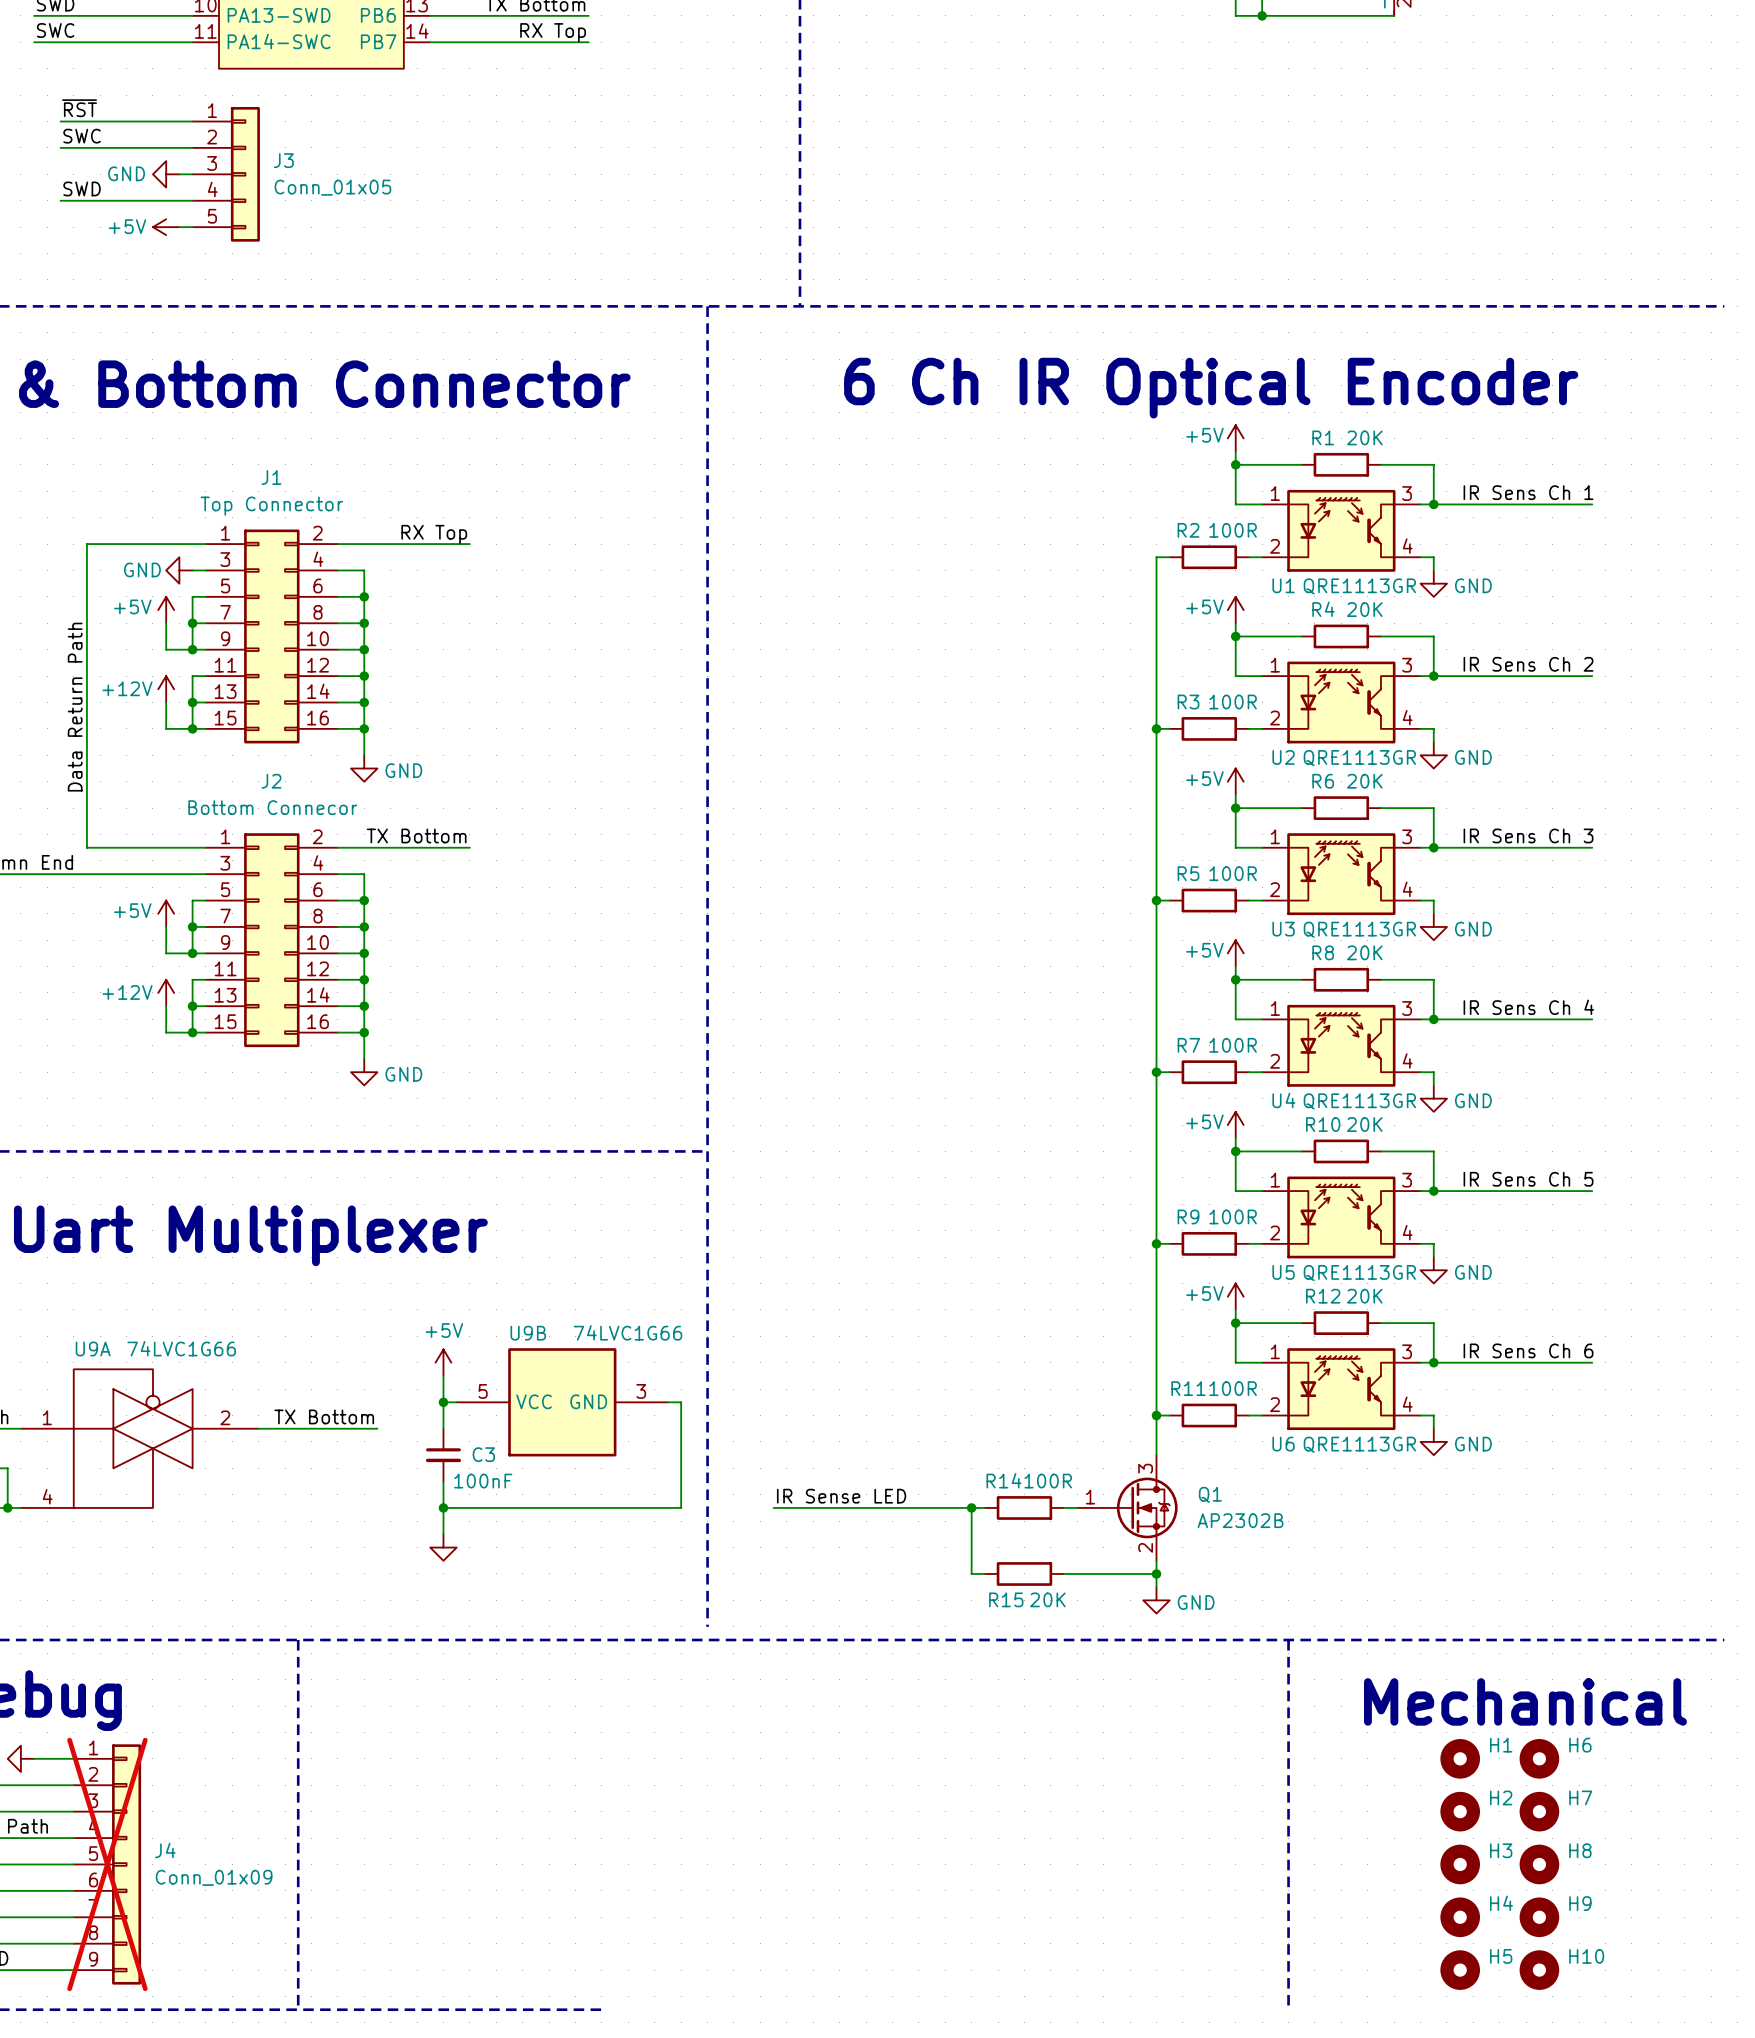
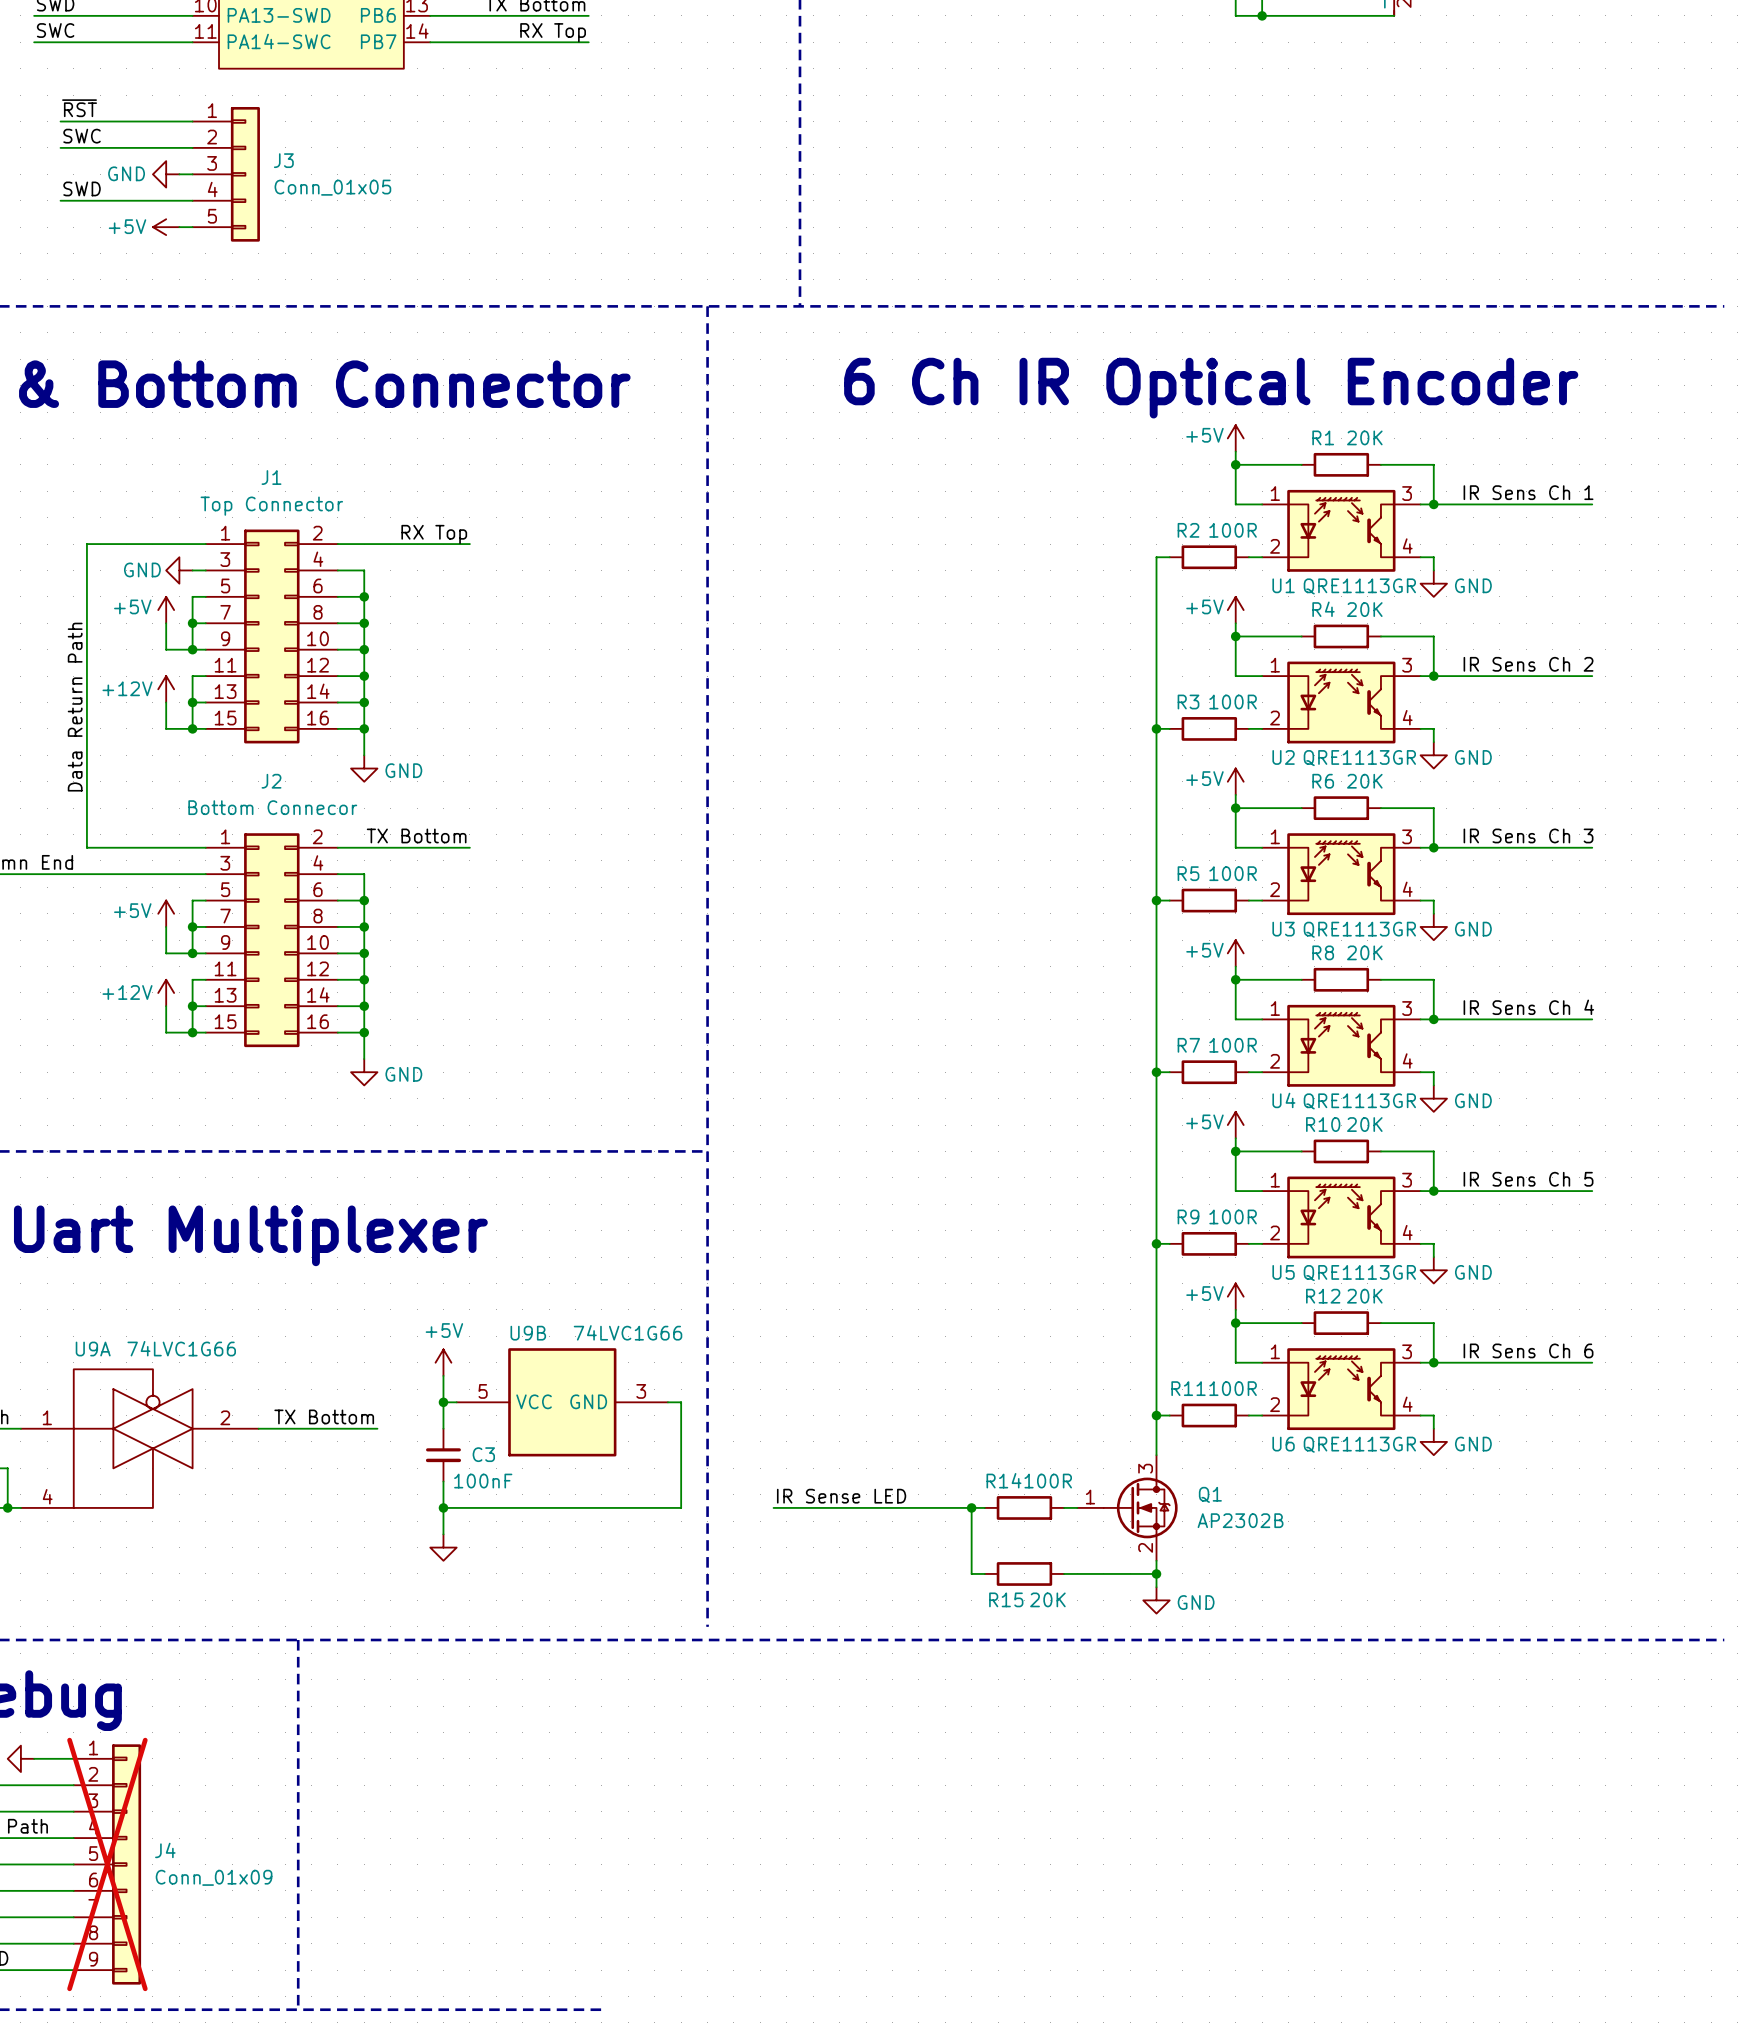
line: (1288, 1640) (1288, 2009) -> none
text: Mechanical (1525, 1701) -> none
H1: (1460, 1758) -> none
H6: (1539, 1758) -> none
H2: (1460, 1811) -> none
H7: (1539, 1811) -> none
H3: (1460, 1864) -> none
H8: (1539, 1864) -> none
H4: (1460, 1917) -> none
H9: (1539, 1917) -> none
H5: (1460, 1970) -> none
H10: (1539, 1970) -> none

